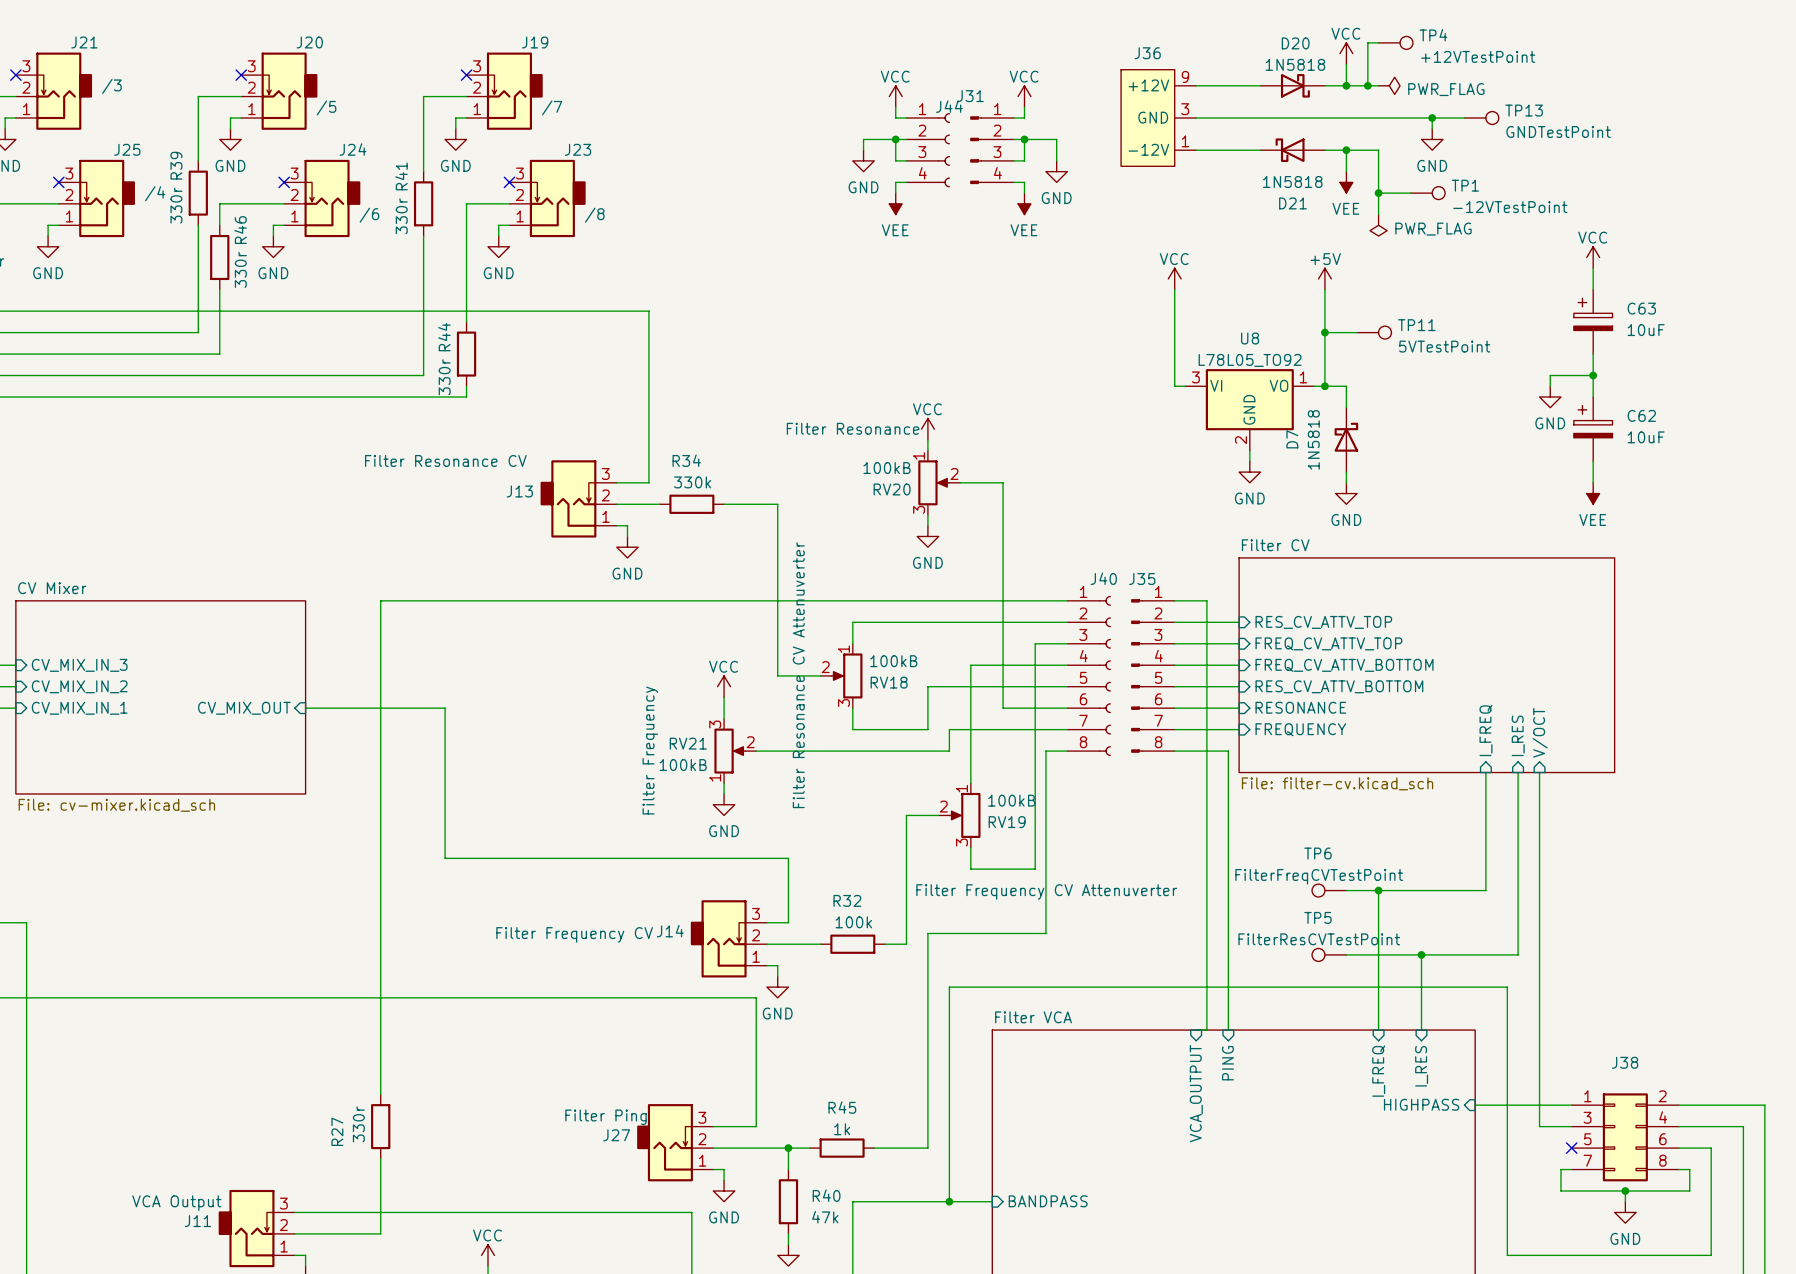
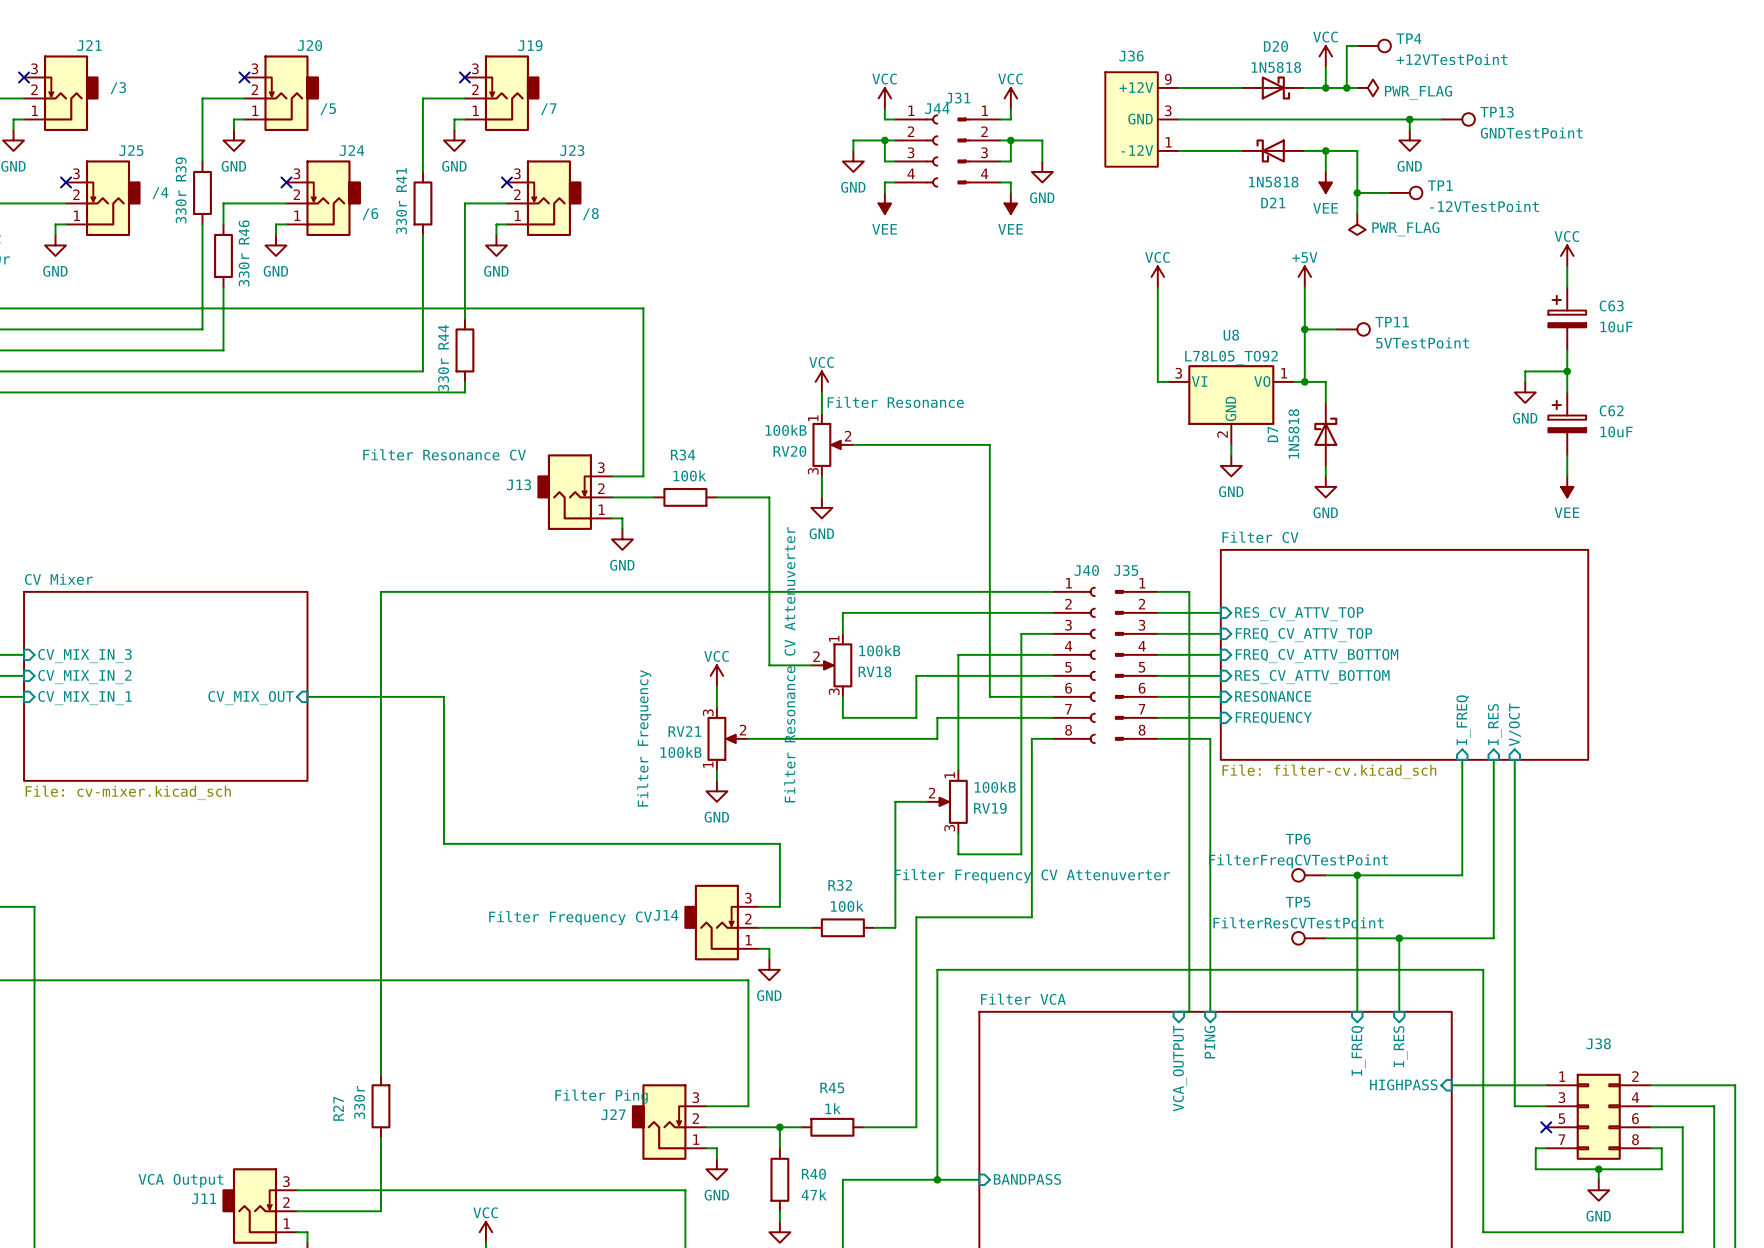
wire: none -> (821, 392) (821, 413)
RV20 text position: Filter Resonance (853, 428) -> Filter Resonance (895, 402)
power symbol position: VCC (927, 429) -> VCC (821, 381)
wire: (927, 439) (927, 450) -> none
R34 value: 330k (692, 482) -> 100k (689, 475)
wire: none -> (821, 476) (821, 497)
RV20 position: (939, 482) -> (832, 444)
wire: (960, 482) (1003, 482) -> (853, 444) (989, 444) (989, 476)
wire: (927, 515) (927, 525) -> none
power symbol position: GND (927, 536) -> GND (821, 507)

